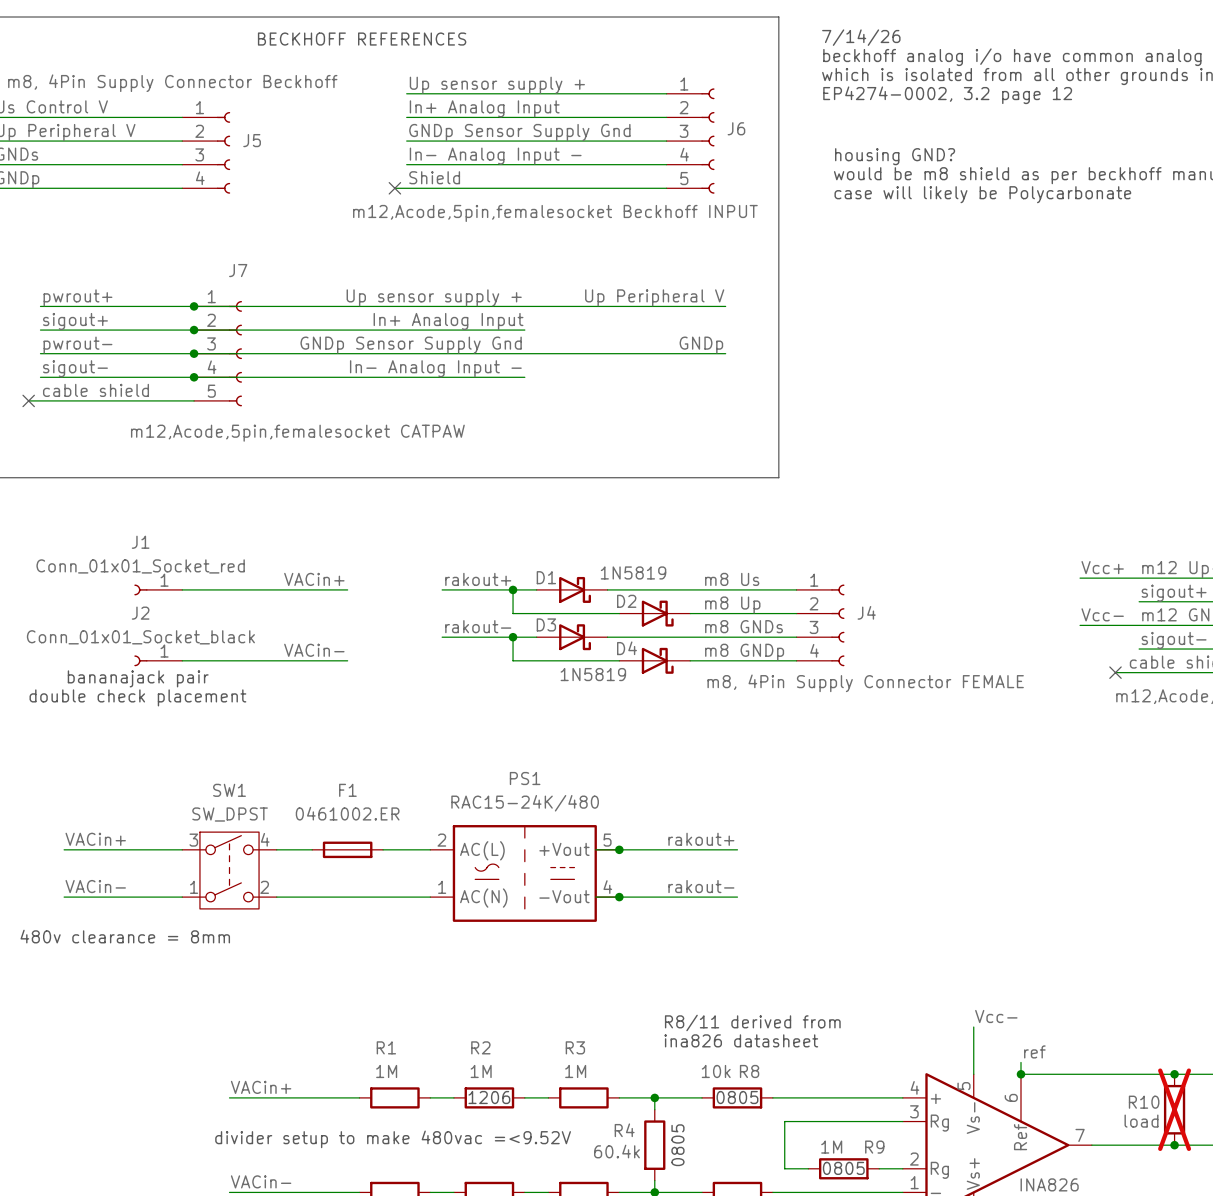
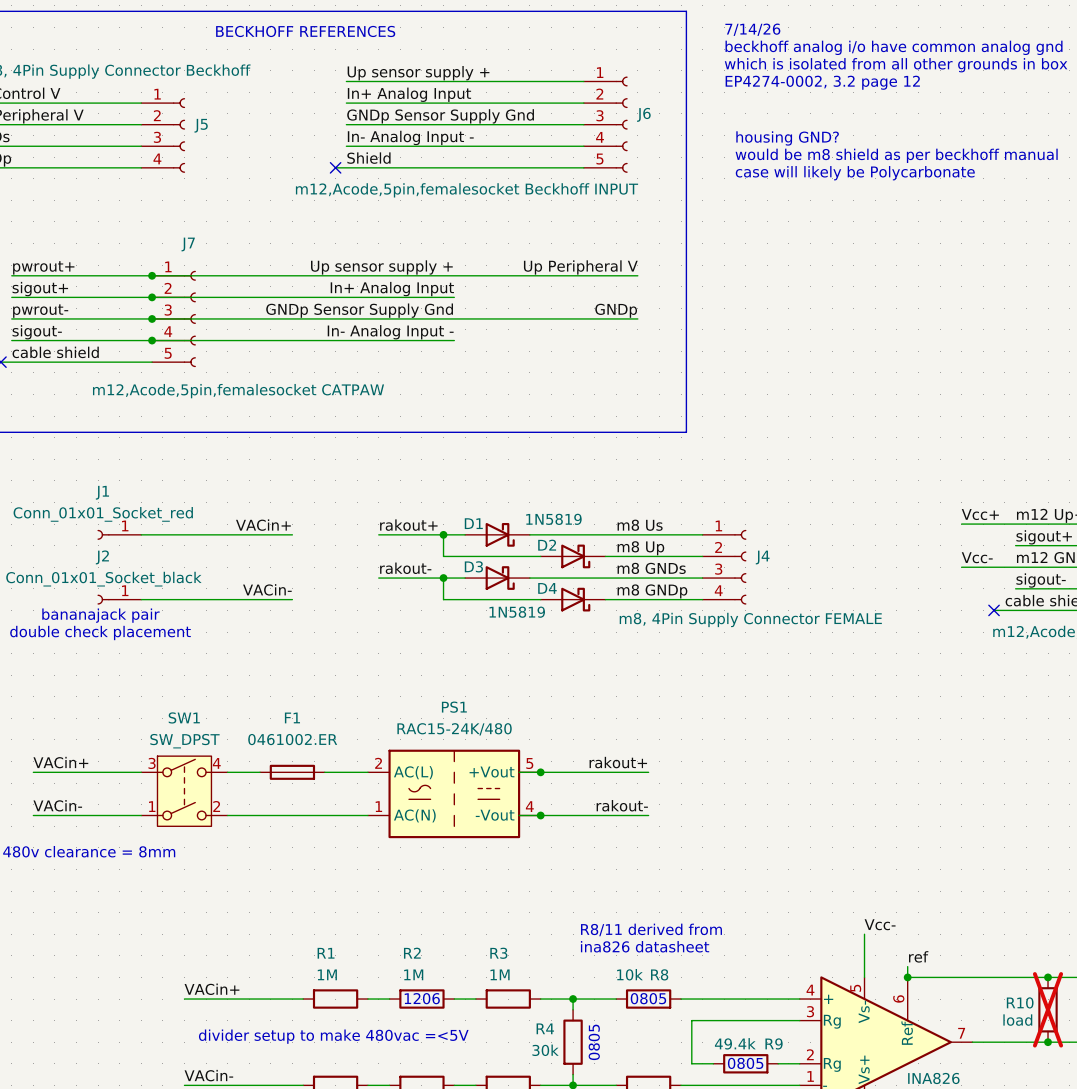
text: divider setup to make 480vac =<9.52V (393, 1139) -> divider setup to make 480vac =<5V (333, 1036)
R9 value: 1M (831, 1147) -> 49.4k (735, 1043)
R4 value: 60.4k (616, 1151) -> 30k (545, 1050)

